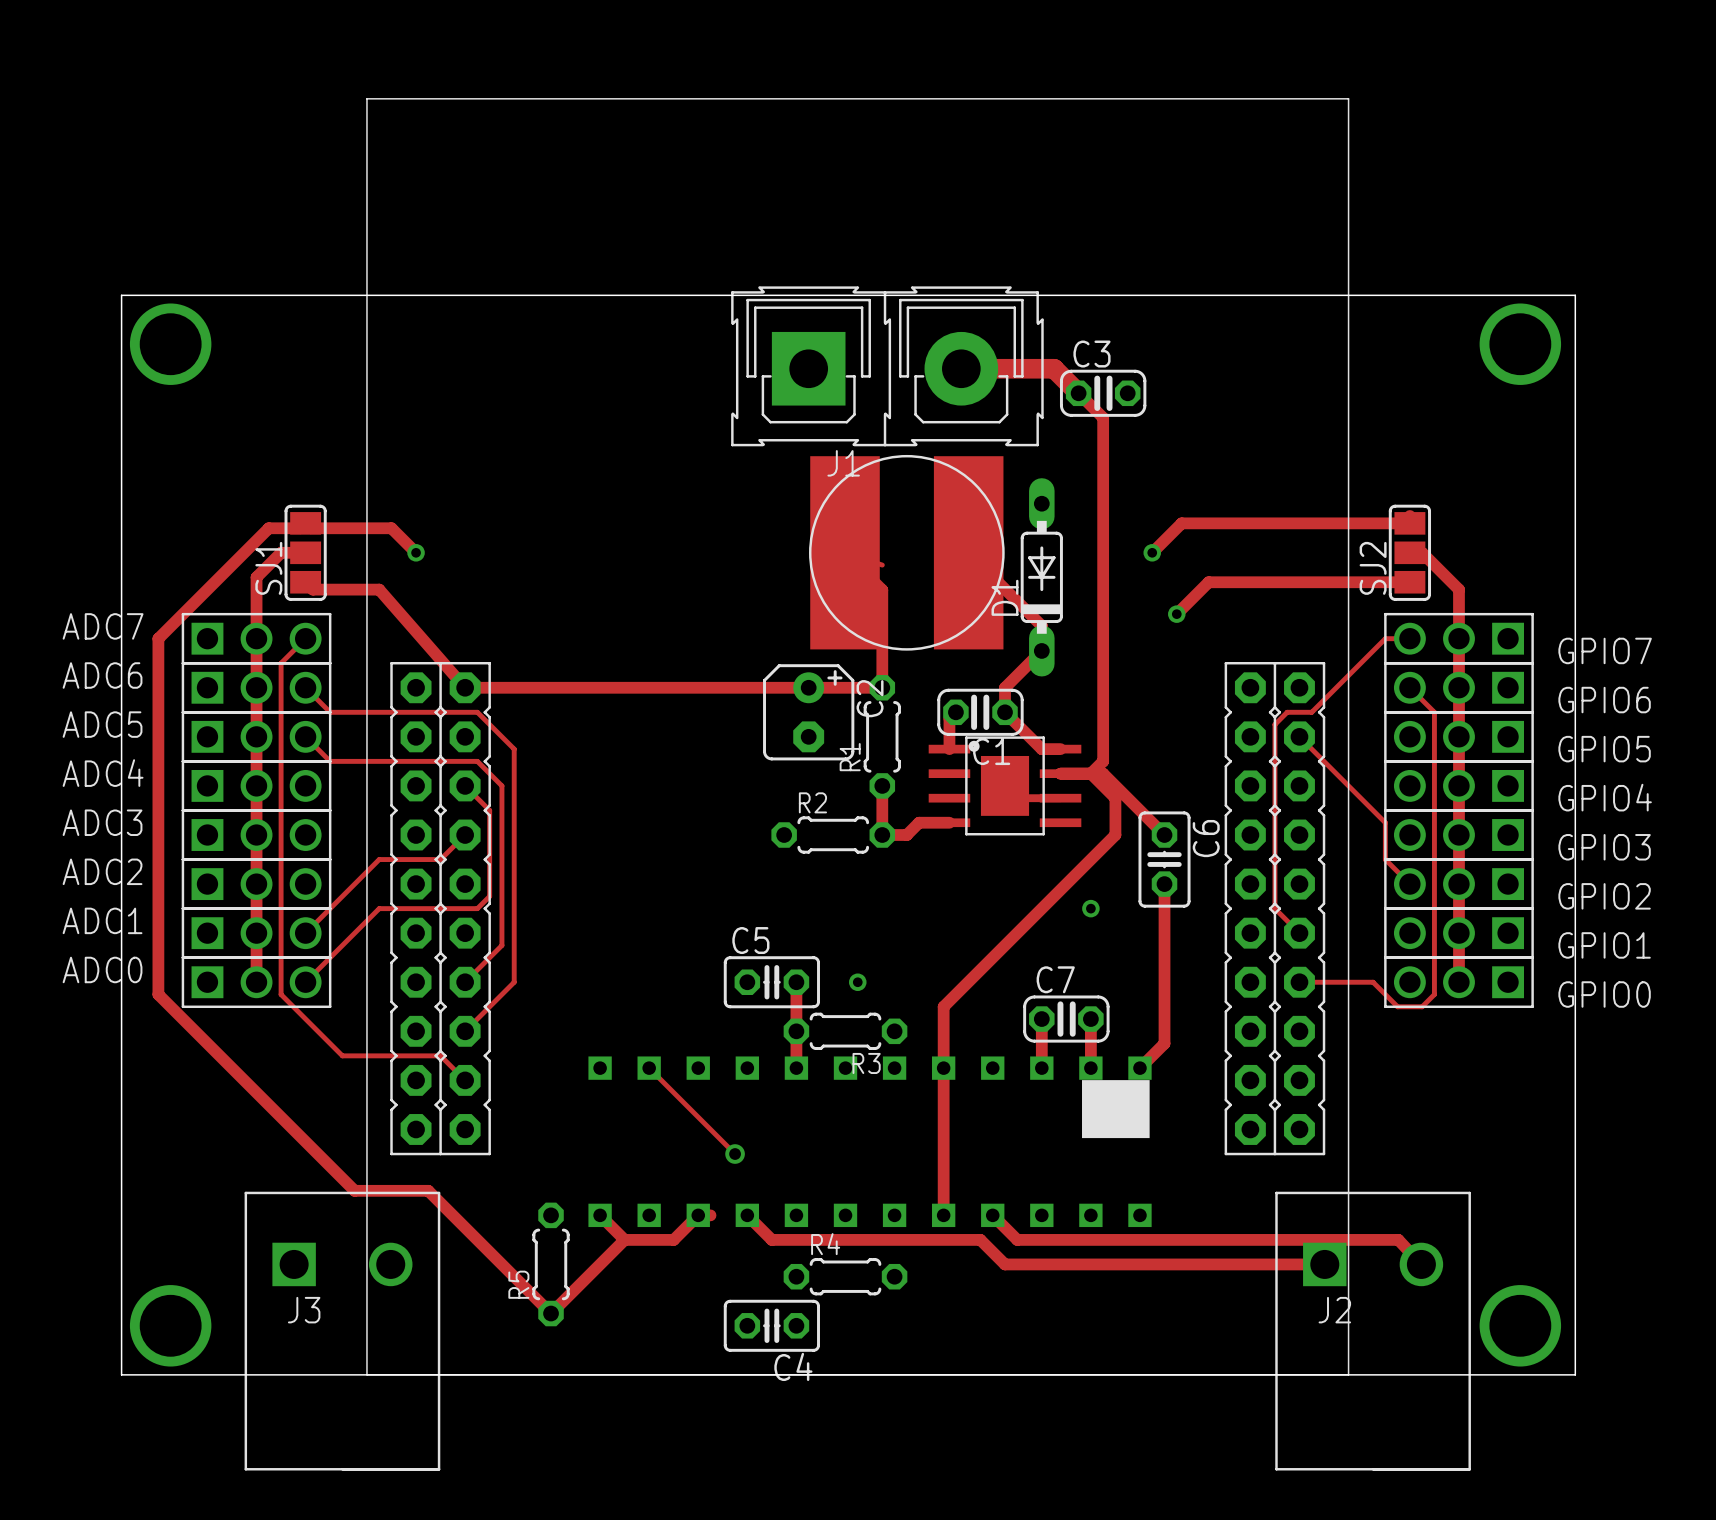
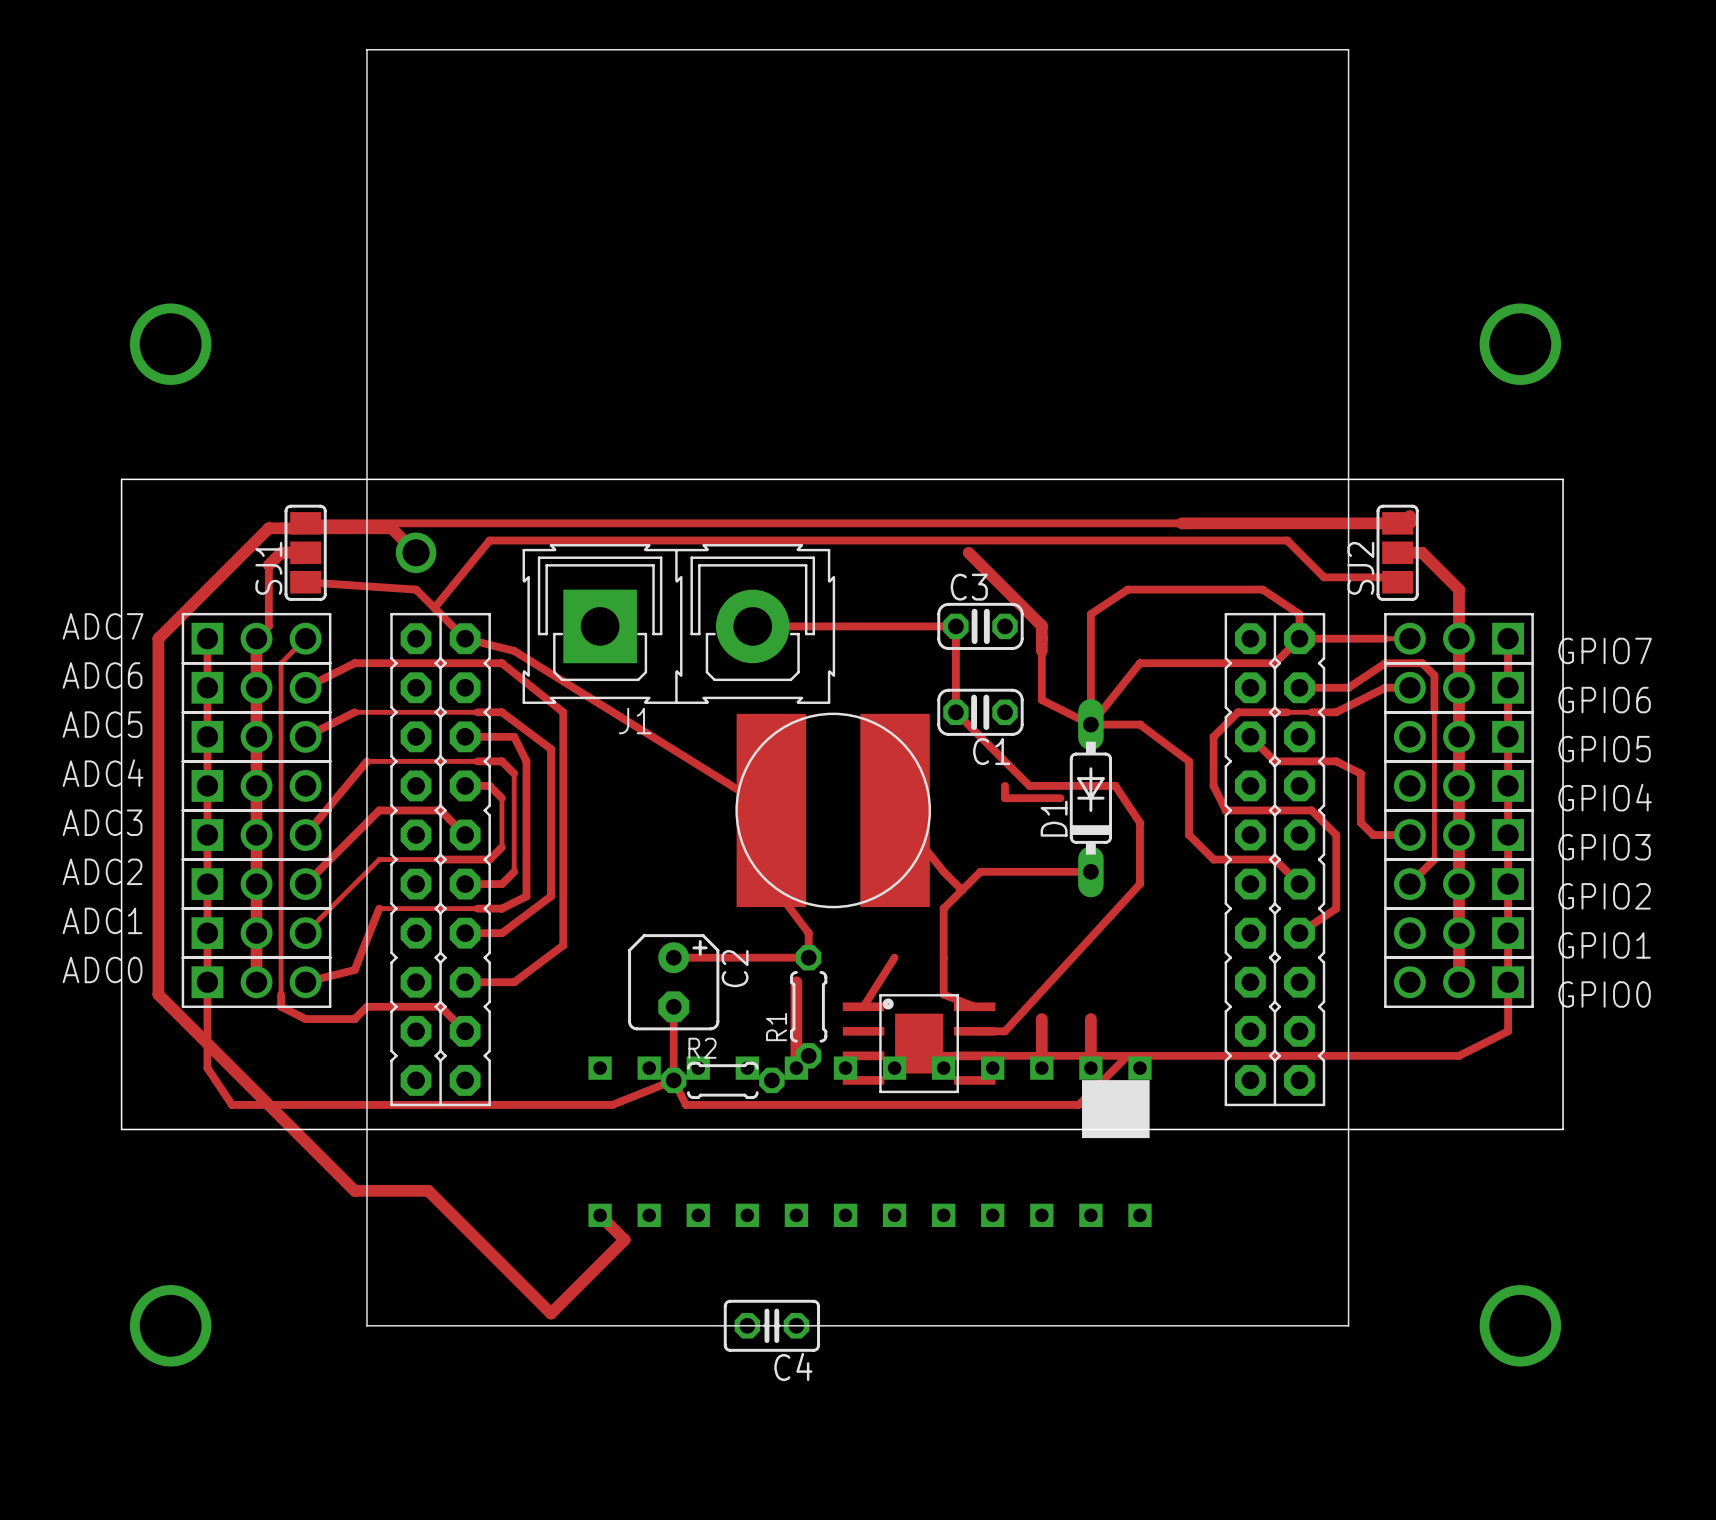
J1 position: (887, 366) -> (678, 624)
track: (961, 368) (1054, 368) (1103, 417) (1103, 761) (1090, 773) (1115, 798) (1115, 835) (943, 1006) (943, 1215) -> none
C3 position: (1103, 393) -> (980, 626)
board edge: (121, 479) (121, 295) (1575, 295) (1575, 1374) (121, 1374) (121, 1129) -> (121, 479) (1563, 479) (1563, 1129) (121, 1129)
track: (1181, 523) (1152, 552) -> (1181, 523) (305, 523)
via size: [407, 544, 425, 562] -> [395, 532, 437, 574]
part position: (906, 552) -> (833, 810)
via: (1152, 552) -> none
SJ2 position: (1409, 552) -> (1397, 552)
track: (268, 565) (256, 577) (256, 638) -> (268, 565) (268, 626) (256, 638)
track: (882, 565) (845, 552) (882, 590) (882, 687) (465, 687) (379, 589) (312, 589) (305, 582) -> (673, 957) (808, 957) (808, 933) (771, 884) (771, 810) (514, 650) (465, 638) (416, 589) (305, 582)
D1 position: (1041, 577) -> (1090, 798)
track: none -> (1397, 582) (1392, 577) (1324, 577) (1287, 540) (489, 540) (434, 608)
track: (1409, 582) (1208, 582) (1176, 614) -> none
via: (1176, 614) -> none
track: none -> (752, 626) (955, 626) (955, 712) (1029, 785) (1115, 785) (1139, 822) (1139, 884) (1005, 1031) (974, 1031)
track: none -> (207, 638) (207, 1068) (232, 1104) (612, 1104) (673, 1080)
track: none -> (1299, 638) (1274, 663) (1139, 663) (1090, 724)
track: none -> (1299, 638) (1299, 614) (1262, 589) (1127, 589) (1090, 614) (1090, 724)
track: none -> (1299, 638) (1385, 638)
track: (1385, 638) (1311, 712) -> (1409, 687) (1385, 687) (1336, 712) (1311, 712)
track: none -> (1508, 638) (1508, 1031) (1458, 1055) (919, 1055) (919, 1043)
track: (1041, 650) (1005, 687) (1005, 712) (1041, 749) (1060, 749) -> (1041, 650) (1041, 700) (1090, 724)
track: (305, 687) (330, 712) (354, 712) -> (305, 736) (354, 712)
track: (1409, 687) (1434, 712) -> (1299, 687) (1348, 687) (1385, 663) (1422, 663) (1434, 675) (1434, 712)
track: (477, 712) (514, 749) (514, 773) -> (477, 761) (501, 761) (514, 773)
track: none -> (477, 712) (501, 712) (551, 749) (551, 896) (501, 933) (465, 933)
C2 position: (808, 712) -> (673, 982)
track: (955, 712) (949, 718) (949, 749) -> none
track: (1287, 712) (1274, 724) (1274, 908) (1299, 933) -> (1287, 712) (1238, 712) (1213, 736) (1213, 785) (1225, 810) (1311, 810) (1336, 835) (1336, 908) (1299, 933)
track: none -> (1090, 724) (1139, 724) (1189, 761) (1189, 835) (1213, 859) (1274, 859) (1299, 884)
track: (305, 736) (330, 761) (366, 761) -> (305, 835) (366, 761)
part position: (857, 736) -> (857, 687)
R1 position: (882, 736) -> (808, 1006)
track: none -> (1250, 736) (1274, 761) (1336, 761) (1360, 773) (1360, 822) (1373, 835) (1409, 835)
track: (1299, 736) (1385, 822) (1385, 859) (1409, 884) -> none
track: (477, 761) (501, 785) (501, 798) -> (465, 785) (489, 785) (501, 798)
track: (1060, 773) (1103, 773) (1164, 835) -> none
track: (465, 785) (489, 810) (489, 896) (477, 908) -> (465, 736) (514, 736) (526, 761) (526, 896) (501, 908) (477, 908)
track: (882, 785) (882, 835) (906, 835) (919, 822) (949, 822) -> none
part position: (1005, 785) -> (919, 1043)
track: none -> (895, 810) (943, 871) (962, 890)
track: (465, 835) (440, 859) -> (501, 847) (489, 859) (440, 859)
track: none -> (465, 835) (440, 810) (379, 810) (305, 884)
R2 position: (833, 835) -> (722, 1080)
track: (501, 847) (501, 945) (465, 982) -> (305, 687) (354, 663) (501, 663) (563, 712) (563, 945) (514, 982) (465, 982)
C6: (1164, 859) -> none
track: (1434, 859) (1434, 994) (1422, 1006) (1397, 1006) (1373, 982) (1299, 982) -> (1434, 859) (1409, 884)
track: (514, 871) (514, 982) (465, 1031) -> (514, 871) (501, 884) (465, 884)
track: none -> (1090, 871) (980, 871) (943, 908) (943, 994) (974, 1006)
track: (1164, 884) (1164, 1043) (1139, 1068) -> none
track: (379, 908) (305, 982) -> (379, 908) (354, 969) (305, 982)
via: (1090, 908) -> none
track: none -> (894, 957) (863, 1006)
C5: (771, 982) -> none
via: (857, 982) -> none
track: (281, 994) (342, 1055) (440, 1055) (465, 1080) -> (281, 994) (281, 1006) (305, 1019) (354, 1019) (366, 1006) (440, 1006) (465, 1031)
track: none -> (673, 1006) (673, 1080)
C7: (1066, 1019) -> none
R3: (845, 1031) -> none
track: none -> (1127, 1055) (1078, 1104) (685, 1104) (673, 1080)
track: (649, 1068) (735, 1154) -> none
via: (735, 1154) -> none
track: (710, 1215) (698, 1215) (673, 1239) (624, 1239) -> none
track: (747, 1215) (771, 1239) (980, 1239) (1005, 1264) (1324, 1264) -> none
track: (992, 1215) (1017, 1239) (1398, 1239) (1421, 1264) -> none
R5: (551, 1264) -> none
R4: (845, 1276) -> none
J3: (342, 1331) -> none
J2: (1373, 1331) -> none

